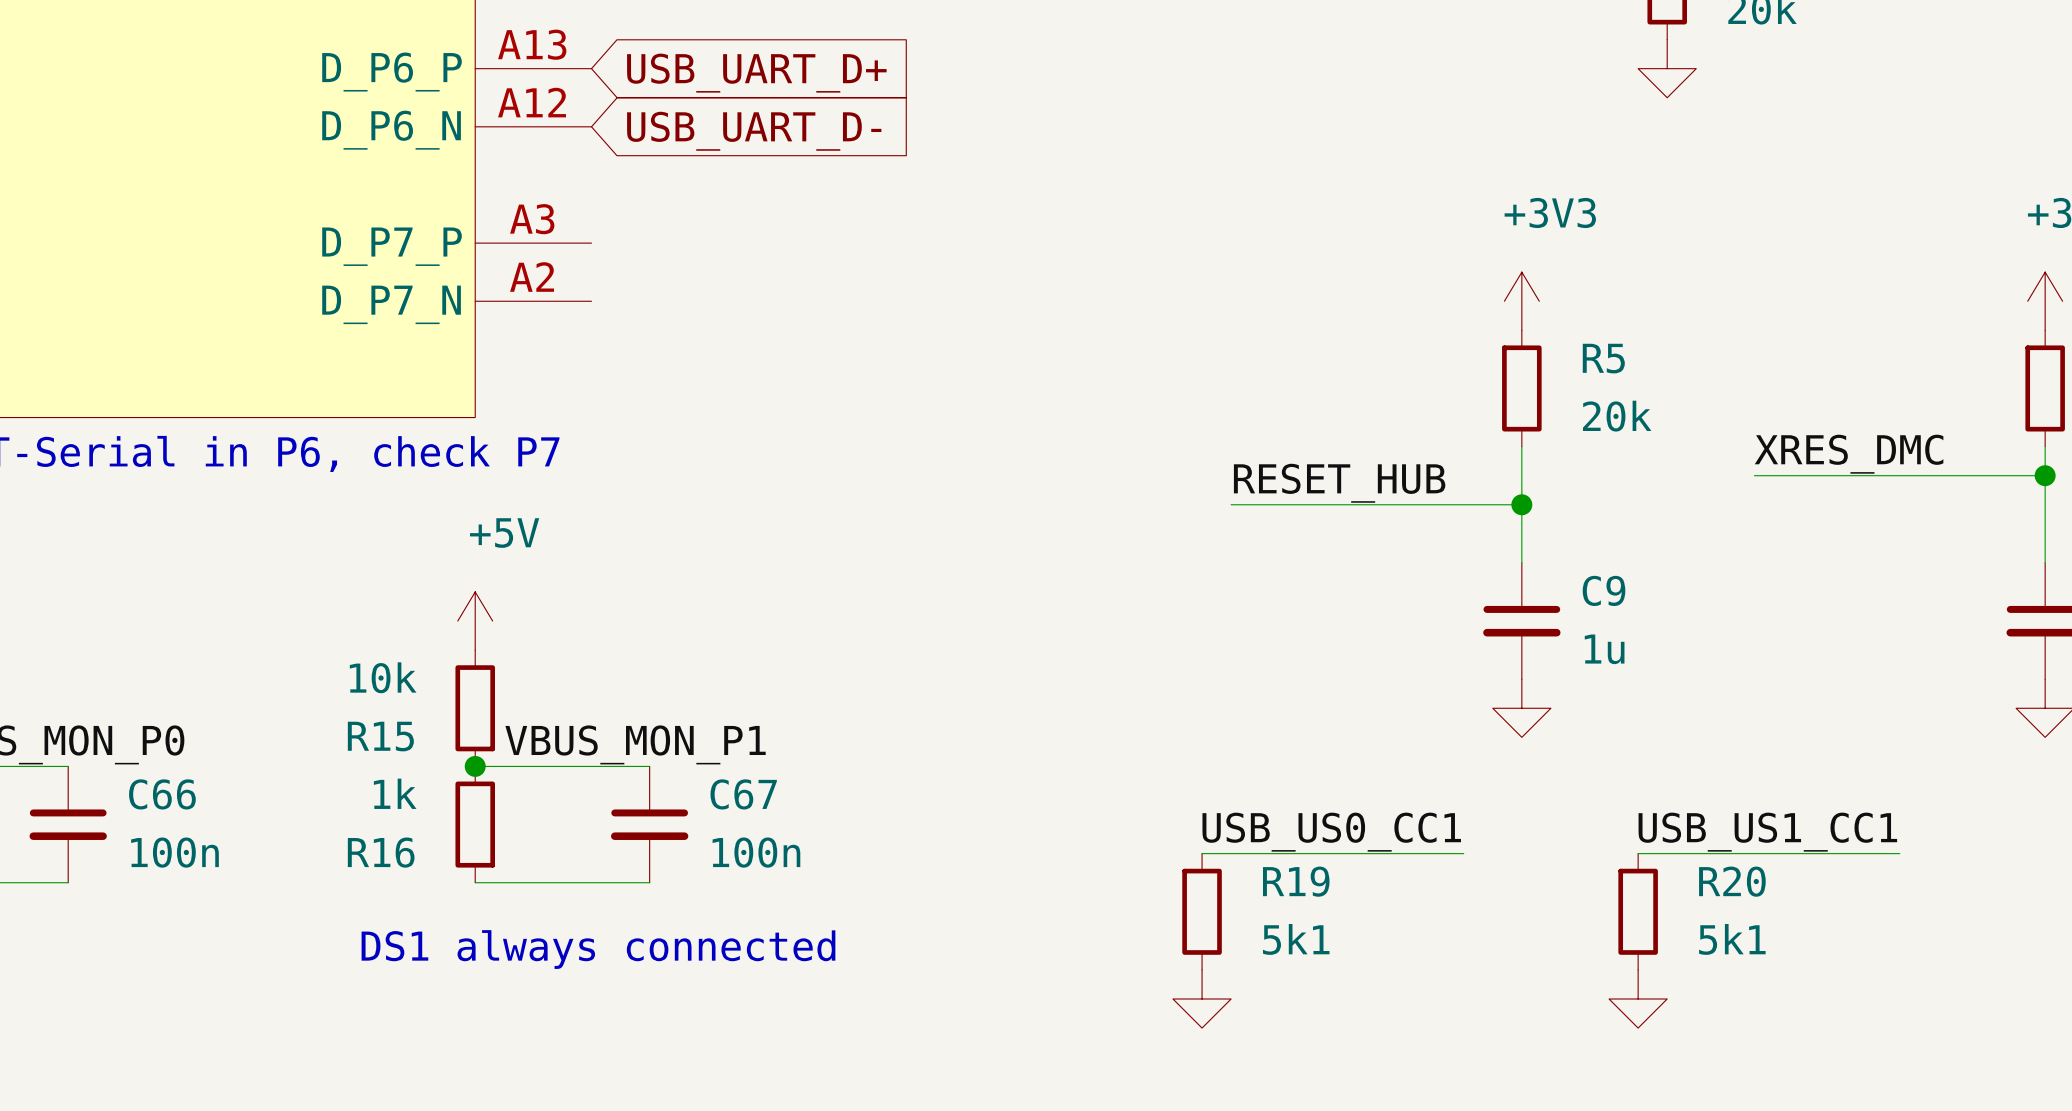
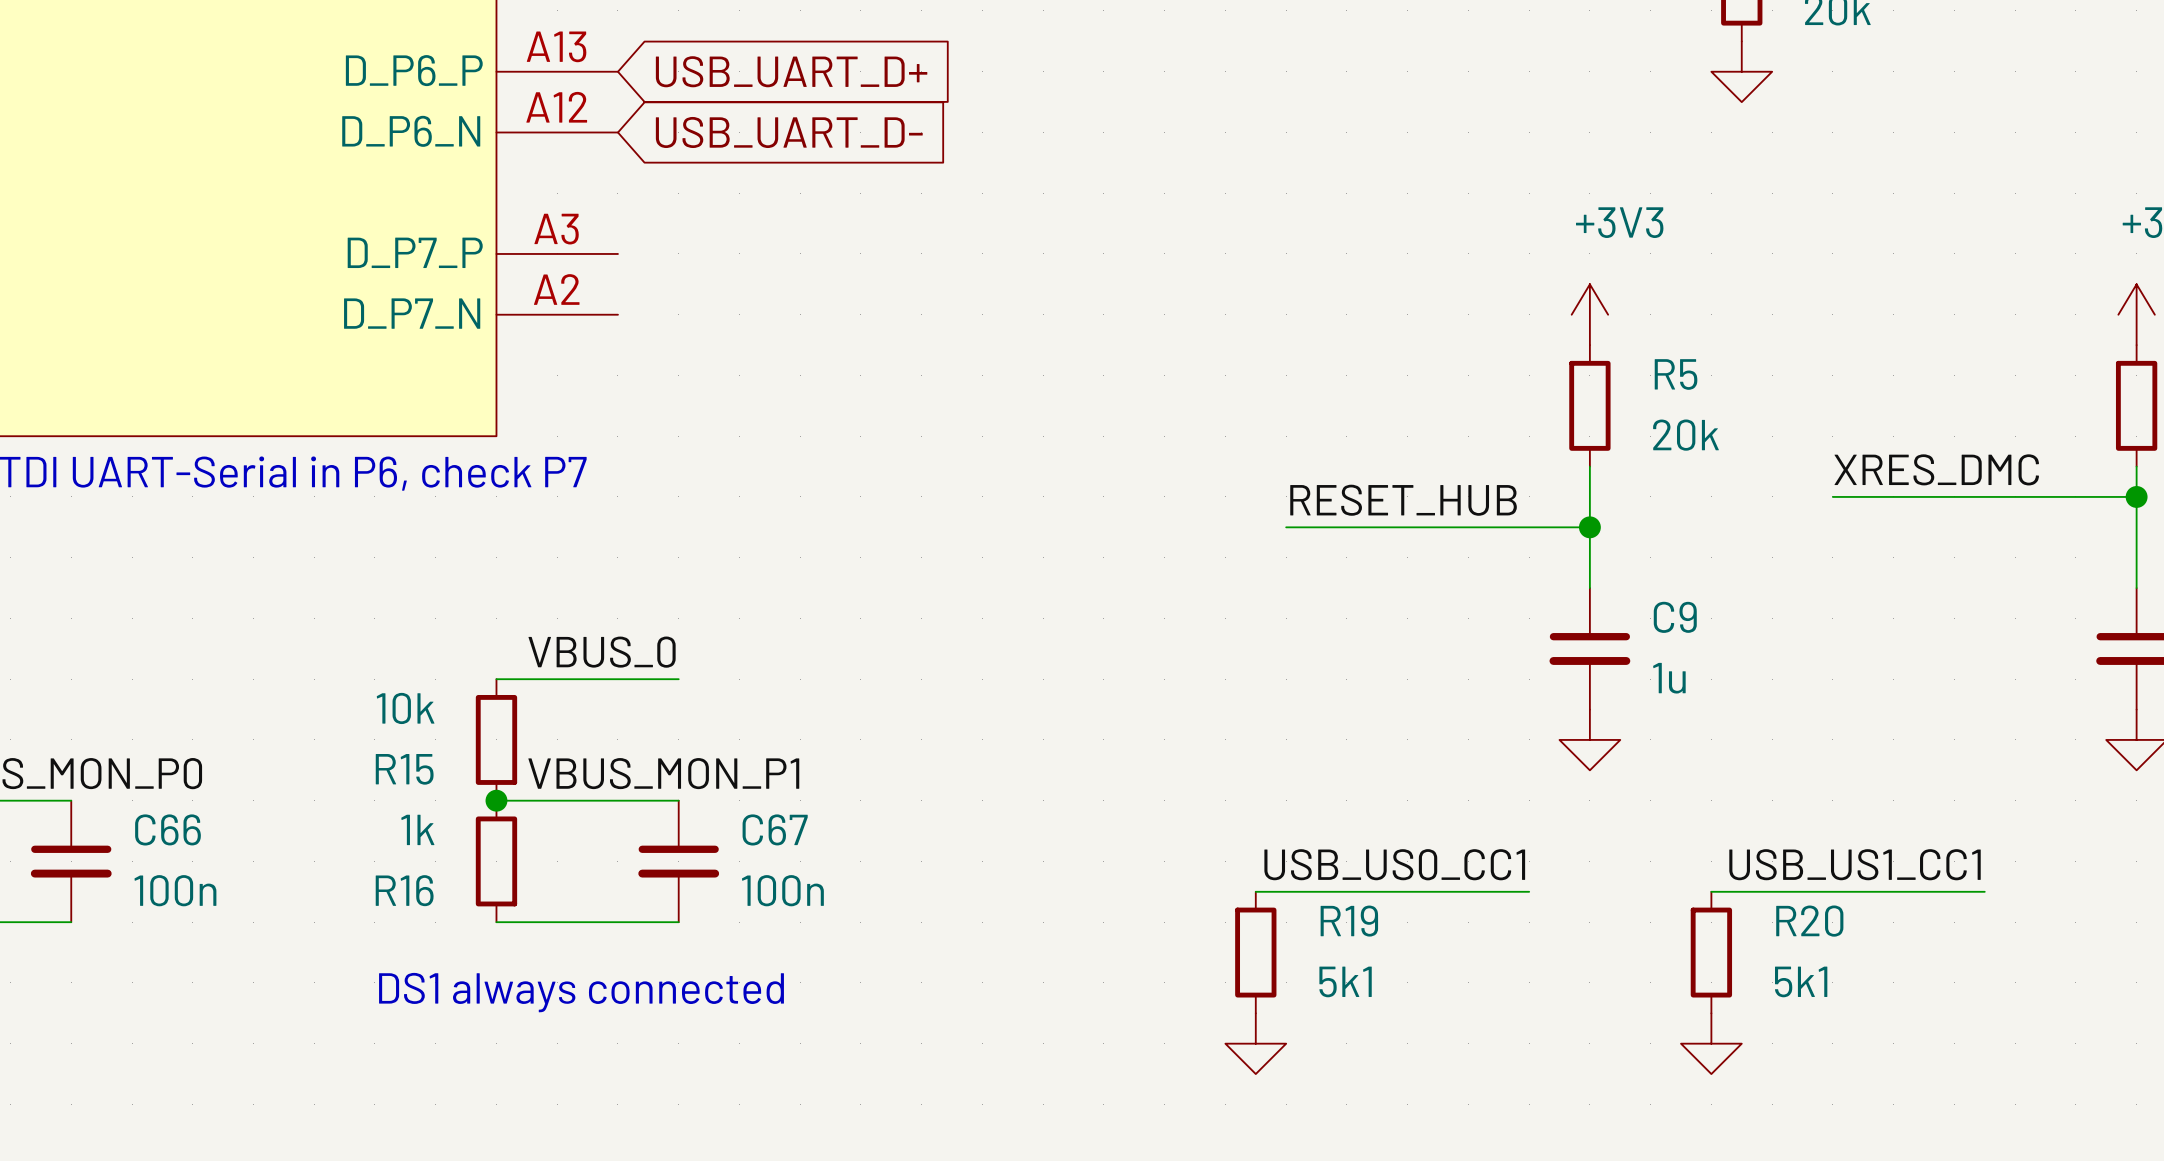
power symbol: +5V (475, 621) -> none
label: none -> VBUS_0 (602, 652)
wire: none -> (496, 679) (678, 679)

